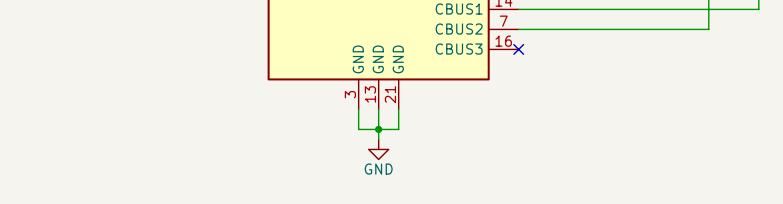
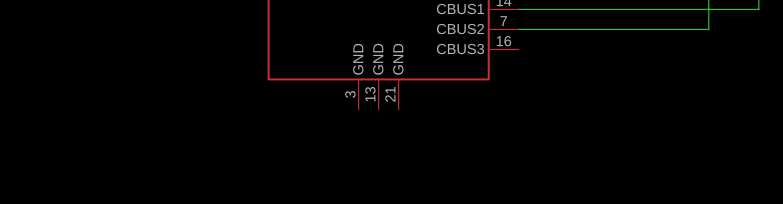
no-connect mark: (518, 49) -> none
wire: (358, 109) (358, 129) (398, 129) (398, 109) -> none
wire: (378, 109) (378, 139) -> none
junction: (378, 129) -> none
power symbol: GND (378, 149) -> none

